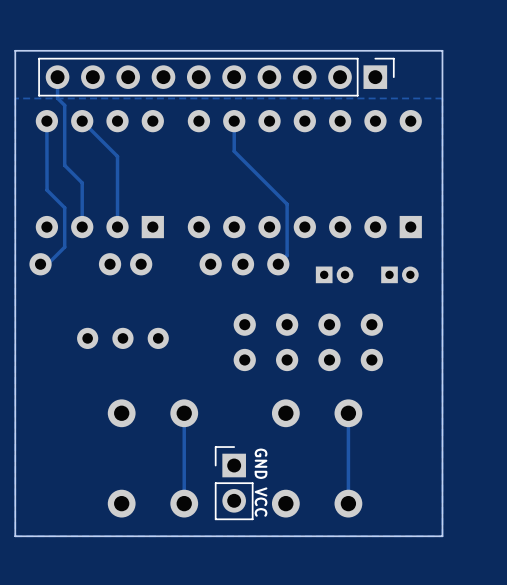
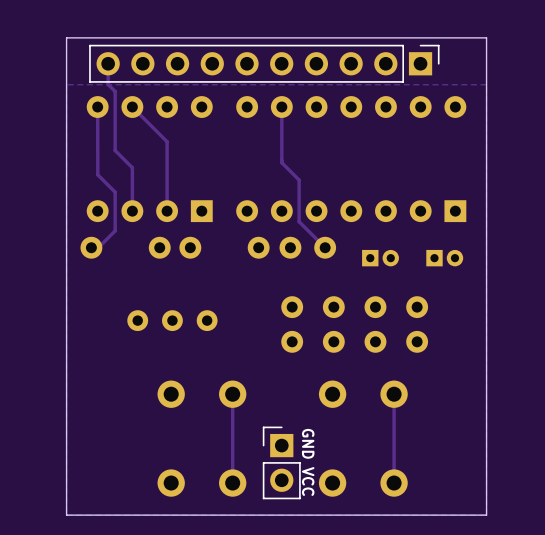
track: (234, 151) (287, 204) (287, 255) (278, 264) -> (281, 136) (281, 162) (299, 180) (299, 221) (325, 247)

